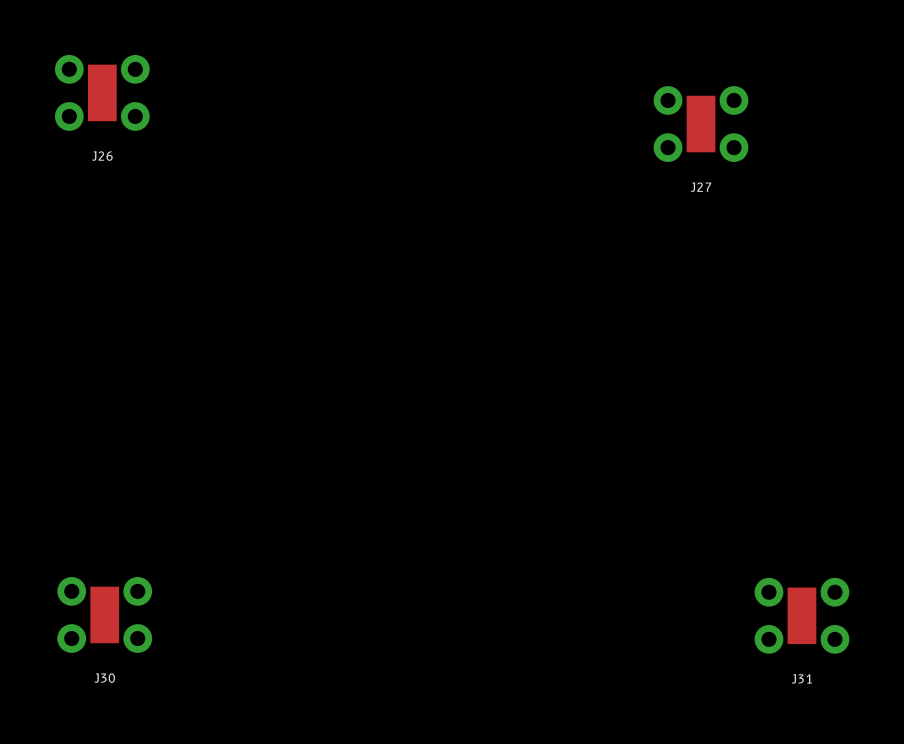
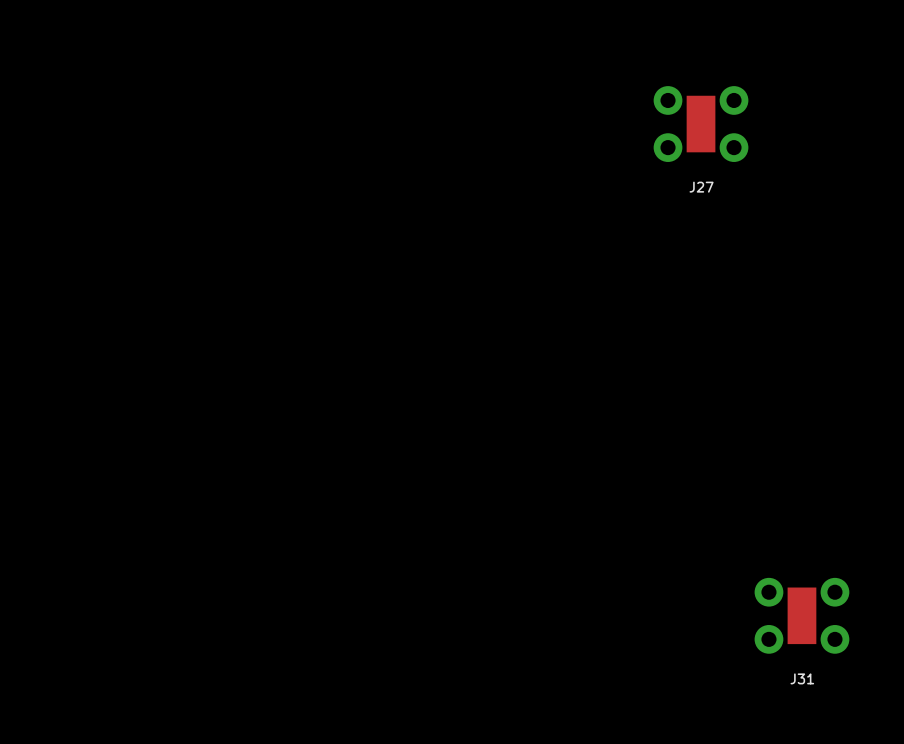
J26: (102, 92) -> none
J30: (104, 614) -> none

